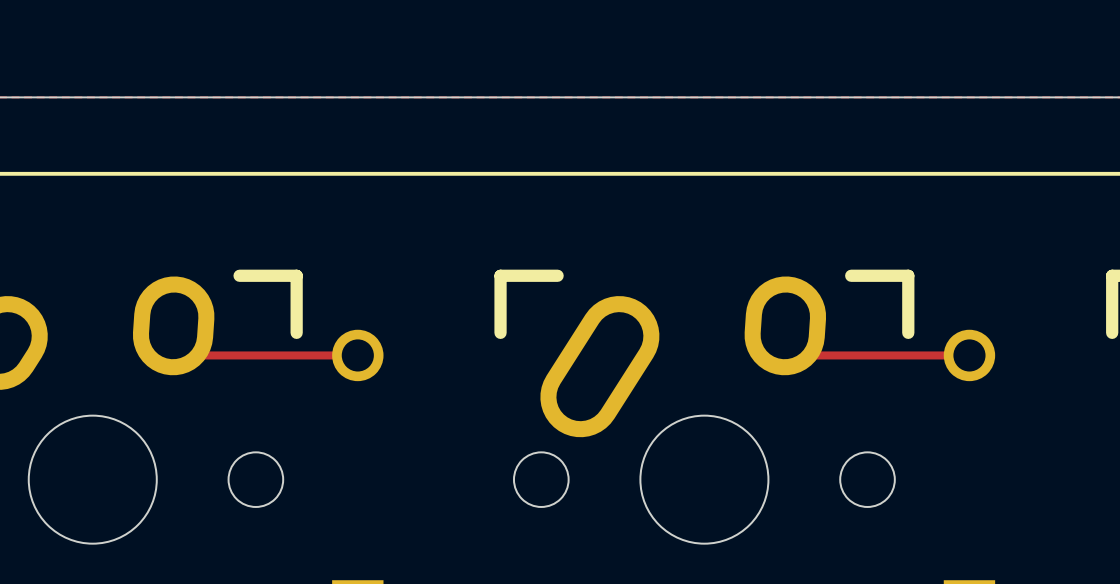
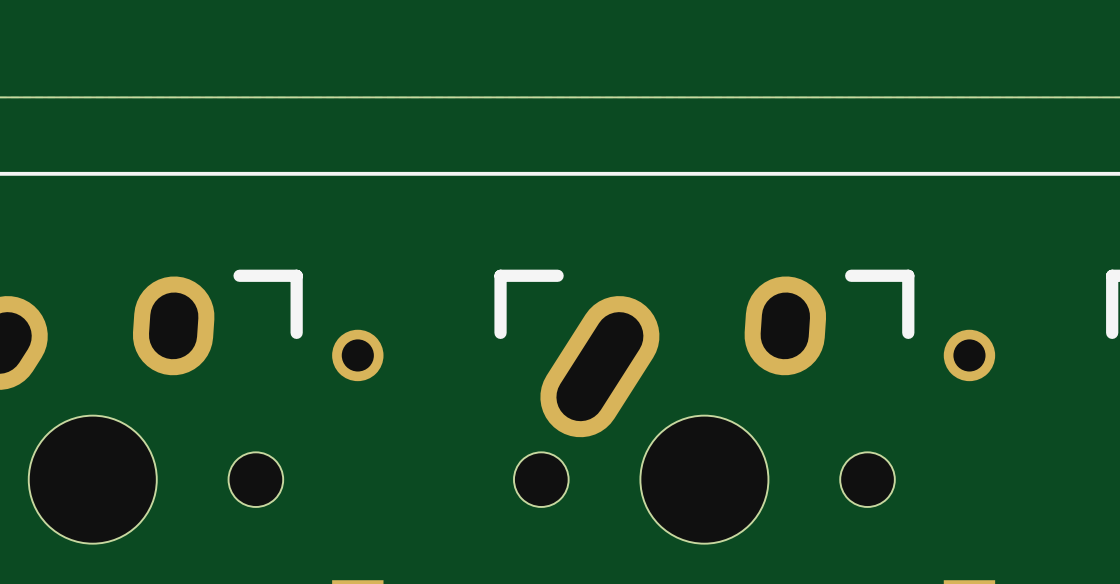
track: (173, 325) (203, 355) (357, 355) -> none
track: (785, 325) (814, 355) (969, 355) -> none

